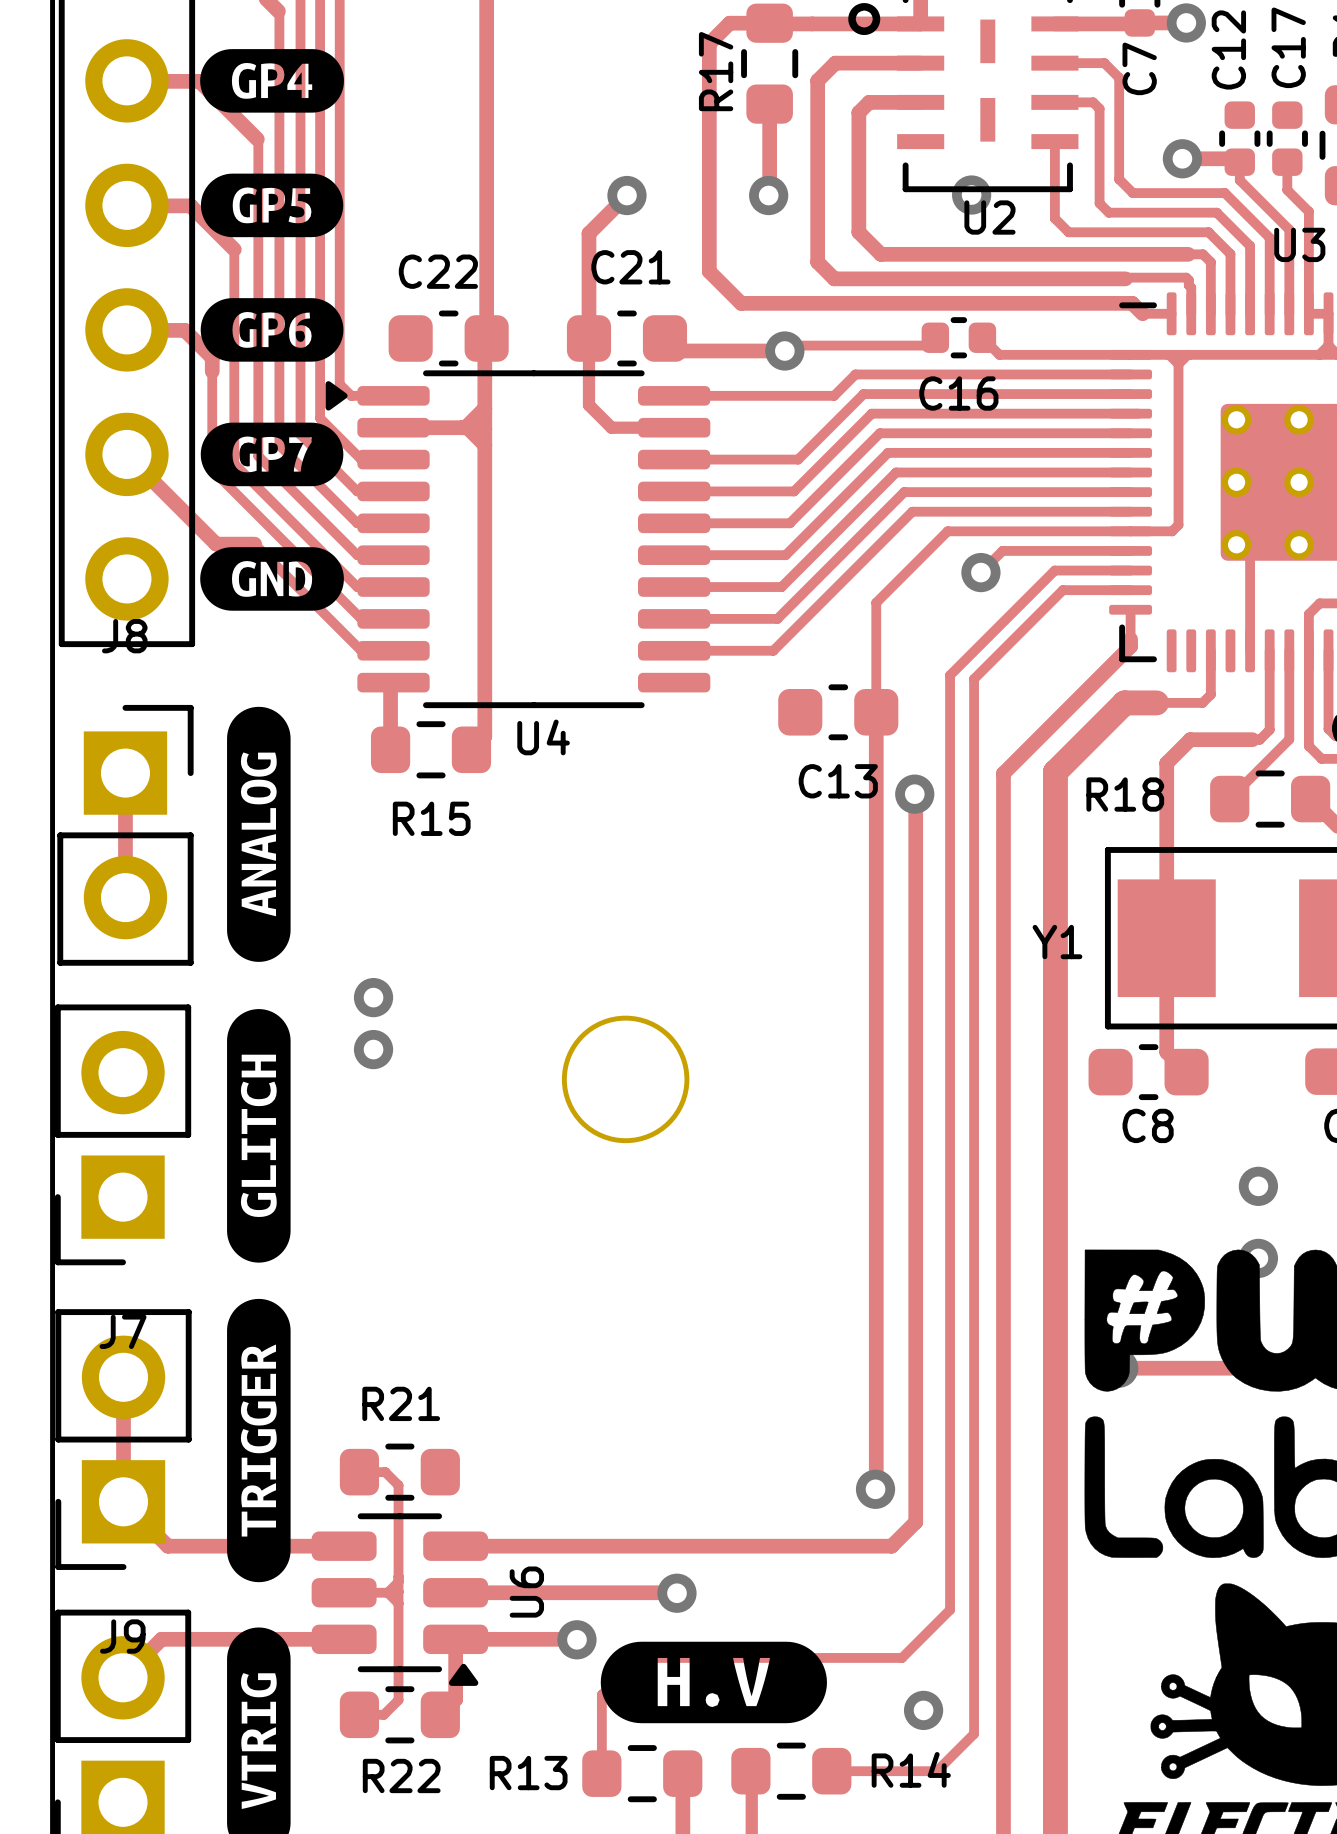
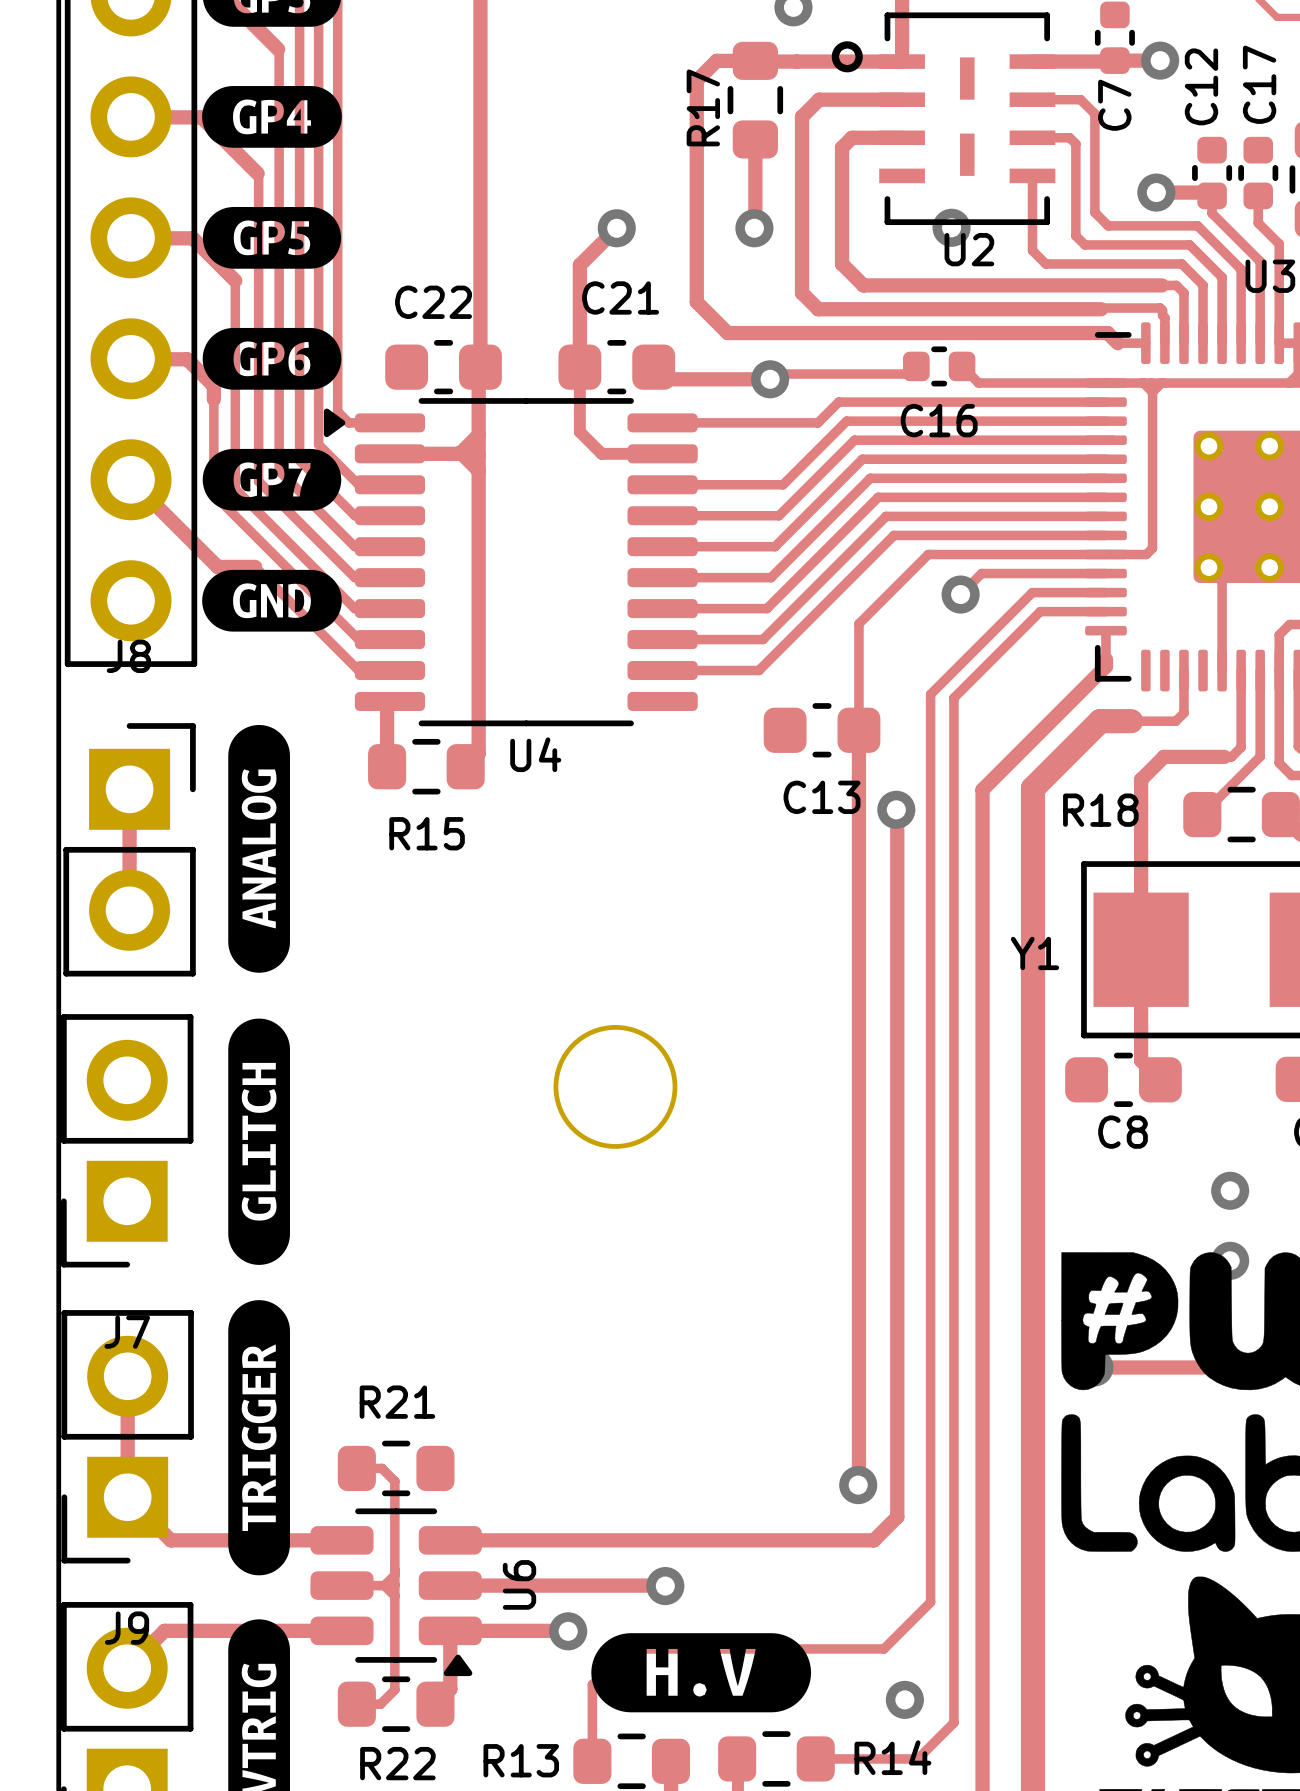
via: (373, 997) -> none
via: (373, 1049) -> none

